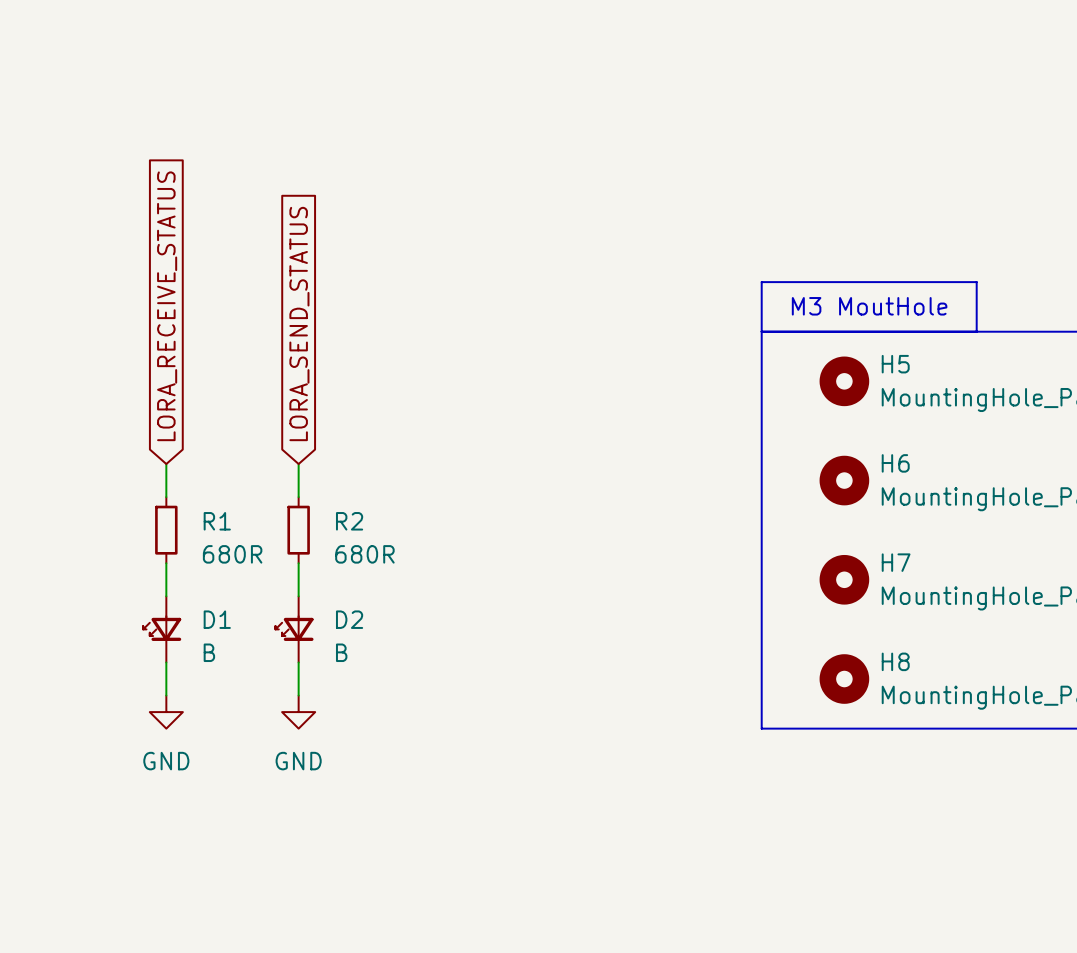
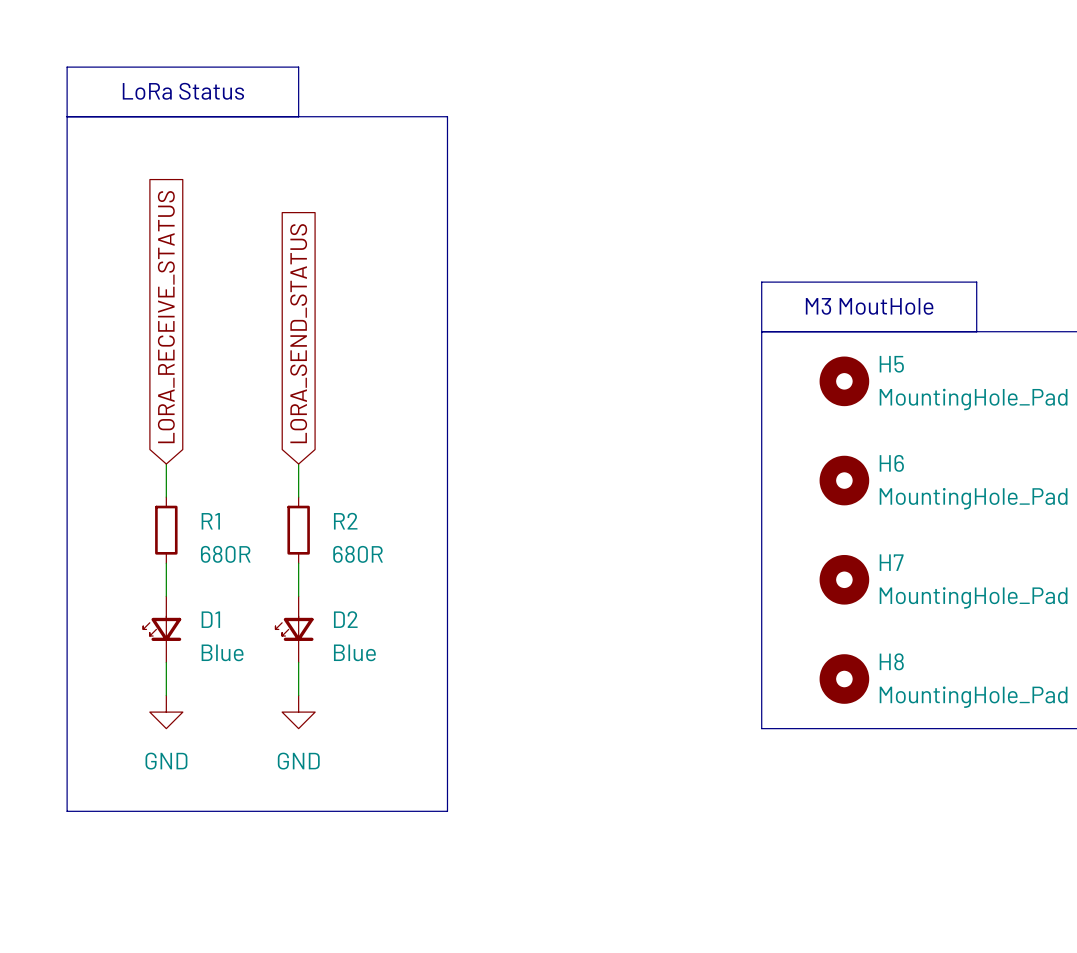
text: none -> LoRa Status (183, 91)
line: none -> (67, 116) (447, 116) (447, 811) (67, 811) (67, 67) (298, 67) (298, 116)
D1 value: B (209, 652) -> Blue (222, 652)
D2 value: B (341, 652) -> Blue (354, 652)

